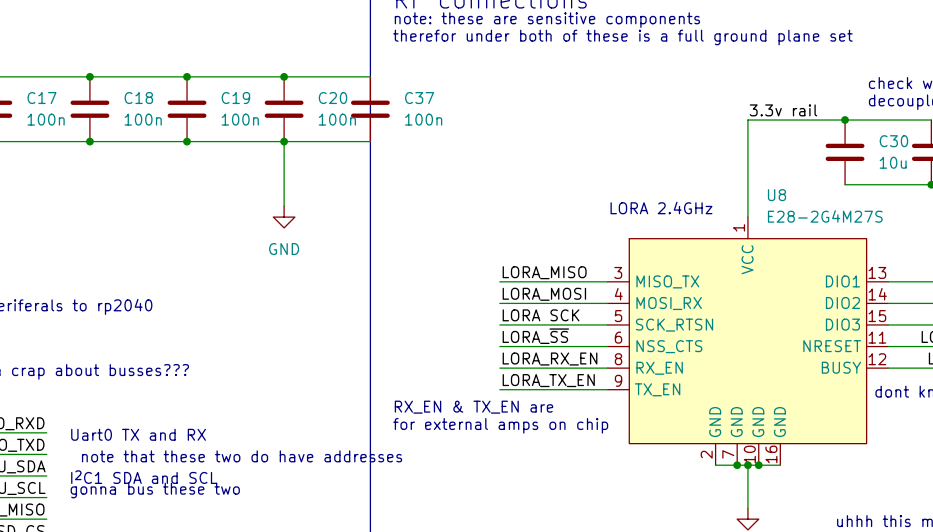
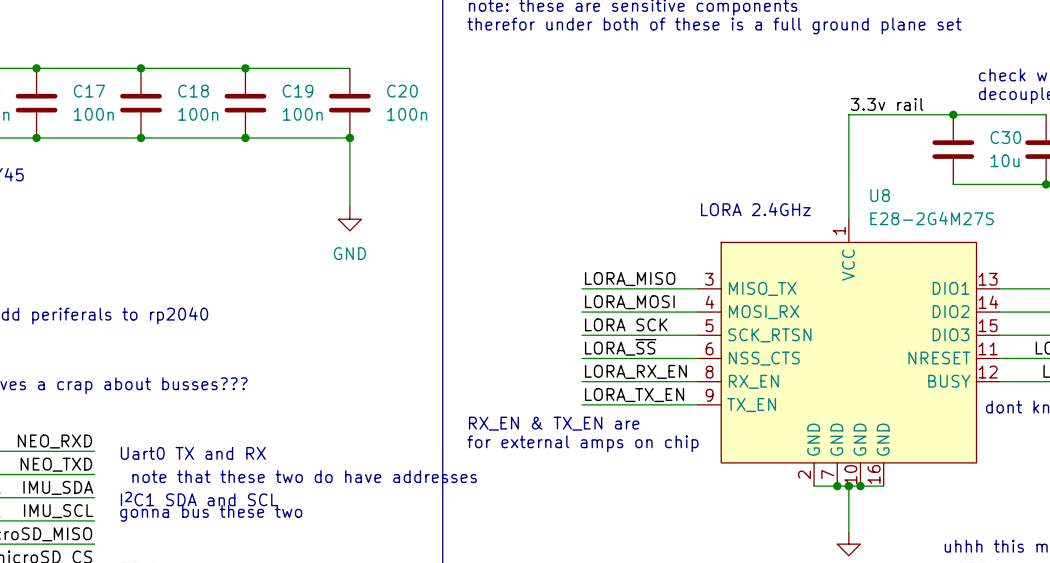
wire: (284, 76) (370, 76) -> none
junction: (284, 76) -> none
C37: 100n (370, 109) -> none
wire: (284, 141) (370, 141) -> none

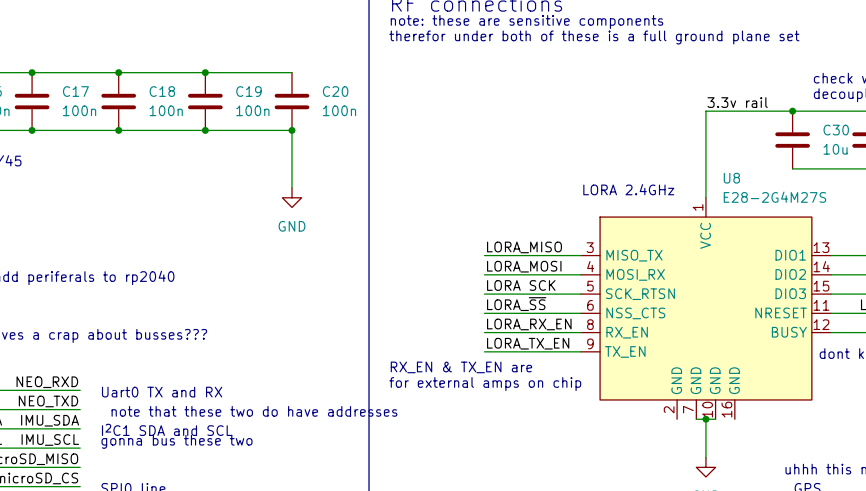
wire: (814, 486) (837, 486) -> none
junction: (837, 486) -> none
wire: (860, 486) (883, 486) -> none
junction: (860, 486) -> none

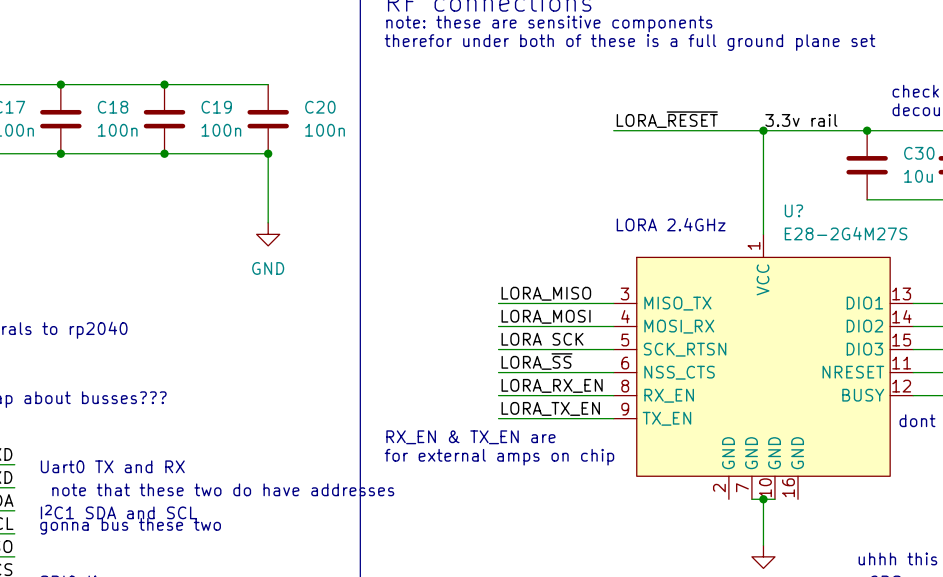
label: none -> LORA_~{RESET} (667, 119)
wire: none -> (613, 130) (763, 130)
junction: none -> (763, 130)
U8 name: U8 (731, 178) -> U? (793, 210)

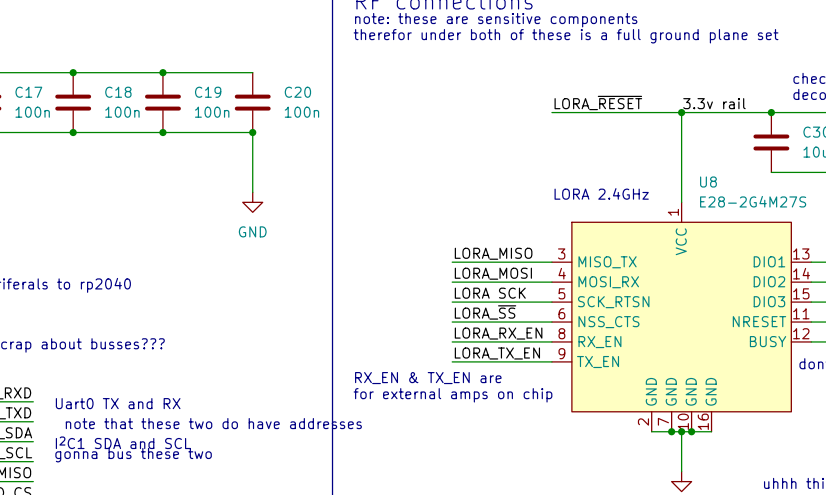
U? name: U? (793, 210) -> U8 (708, 182)
wire: none -> (651, 431) (671, 431)
junction: none -> (671, 431)
wire: none -> (691, 431) (711, 431)
junction: none -> (691, 431)

